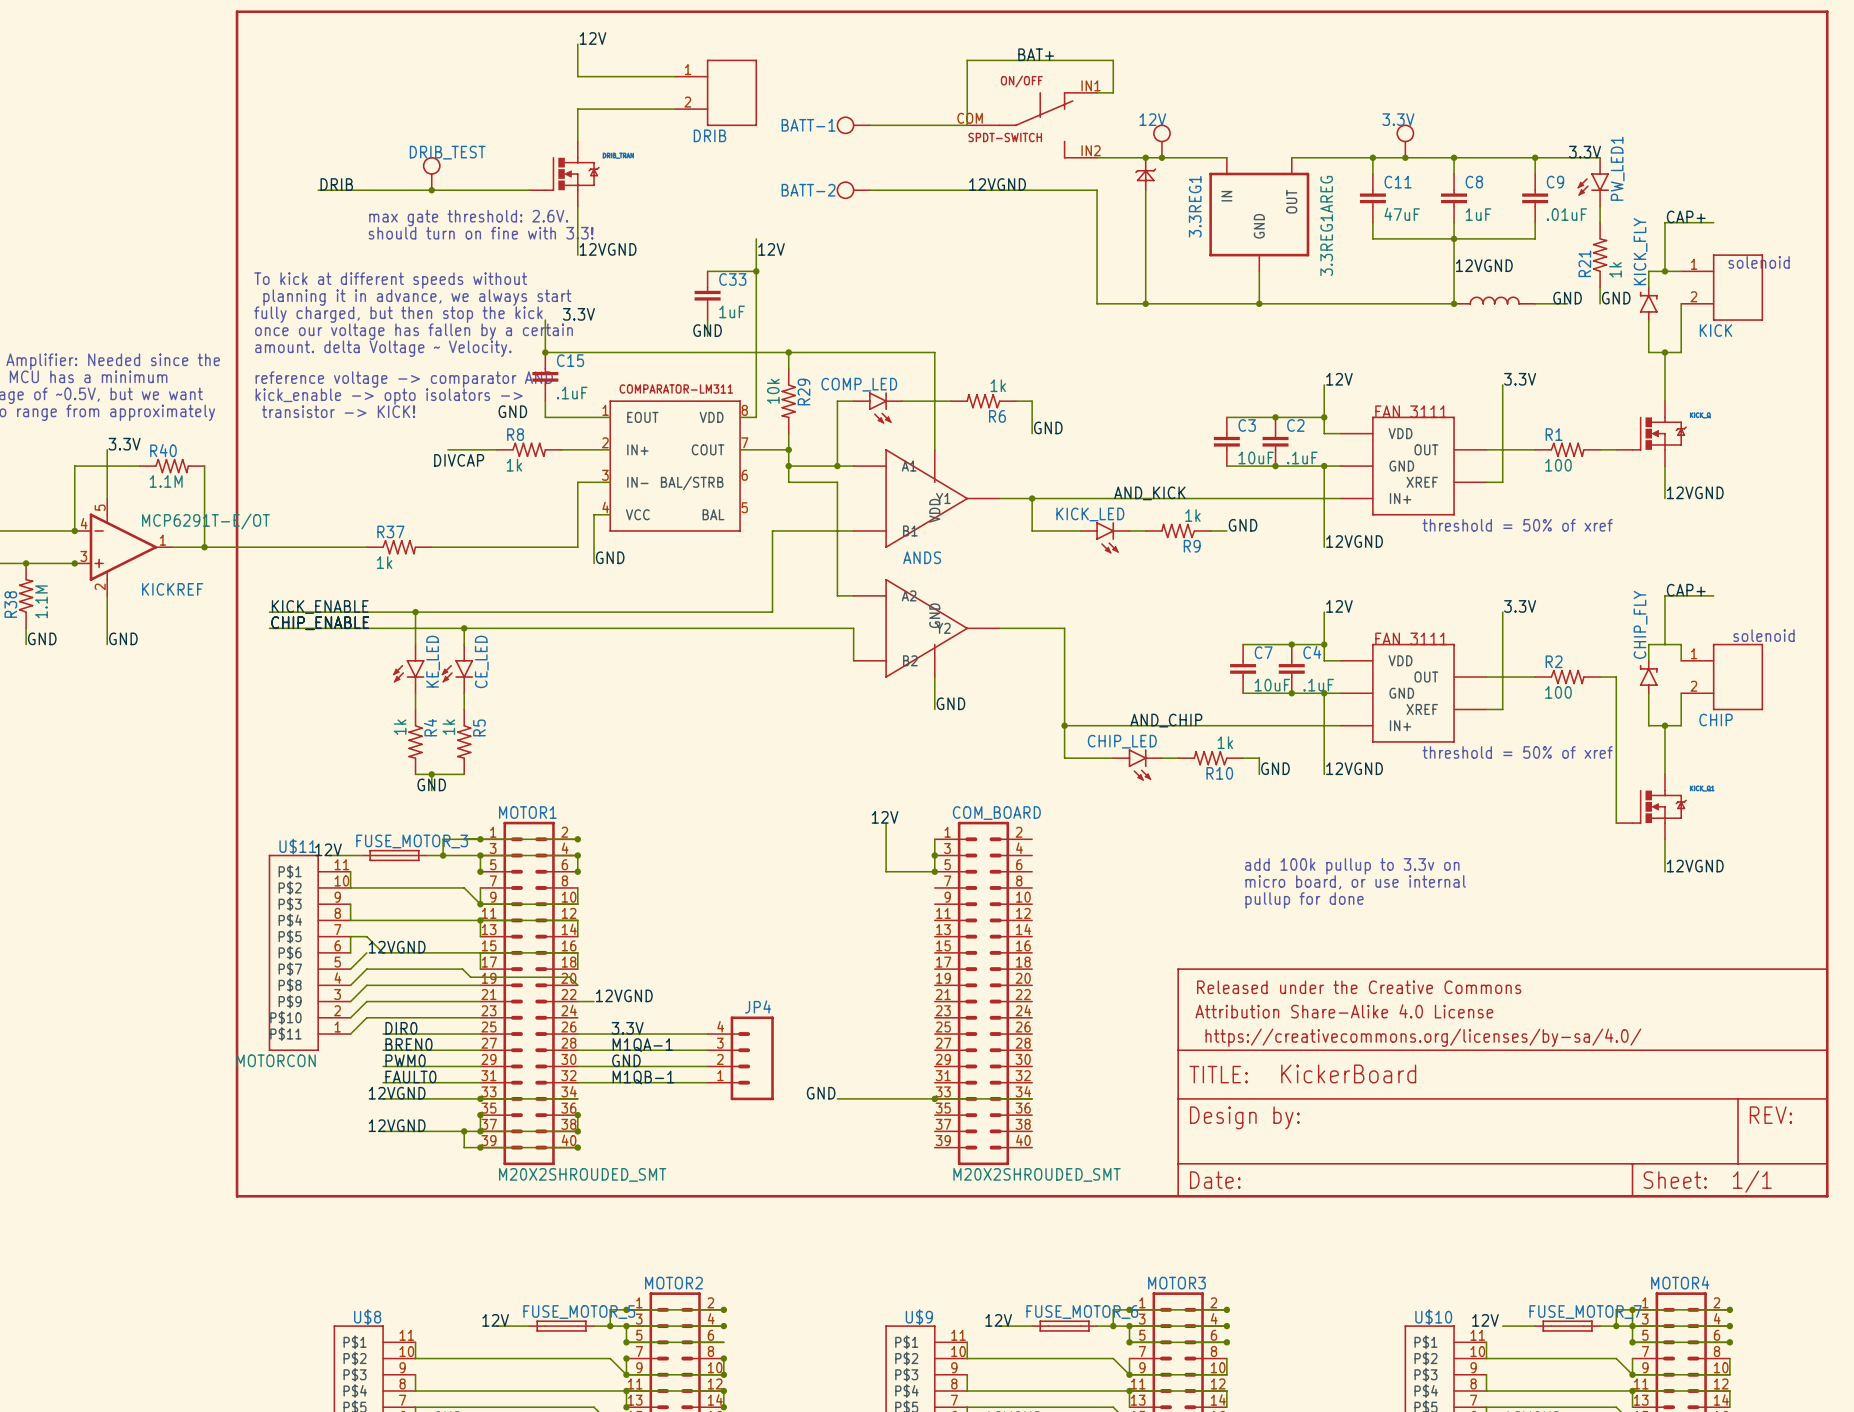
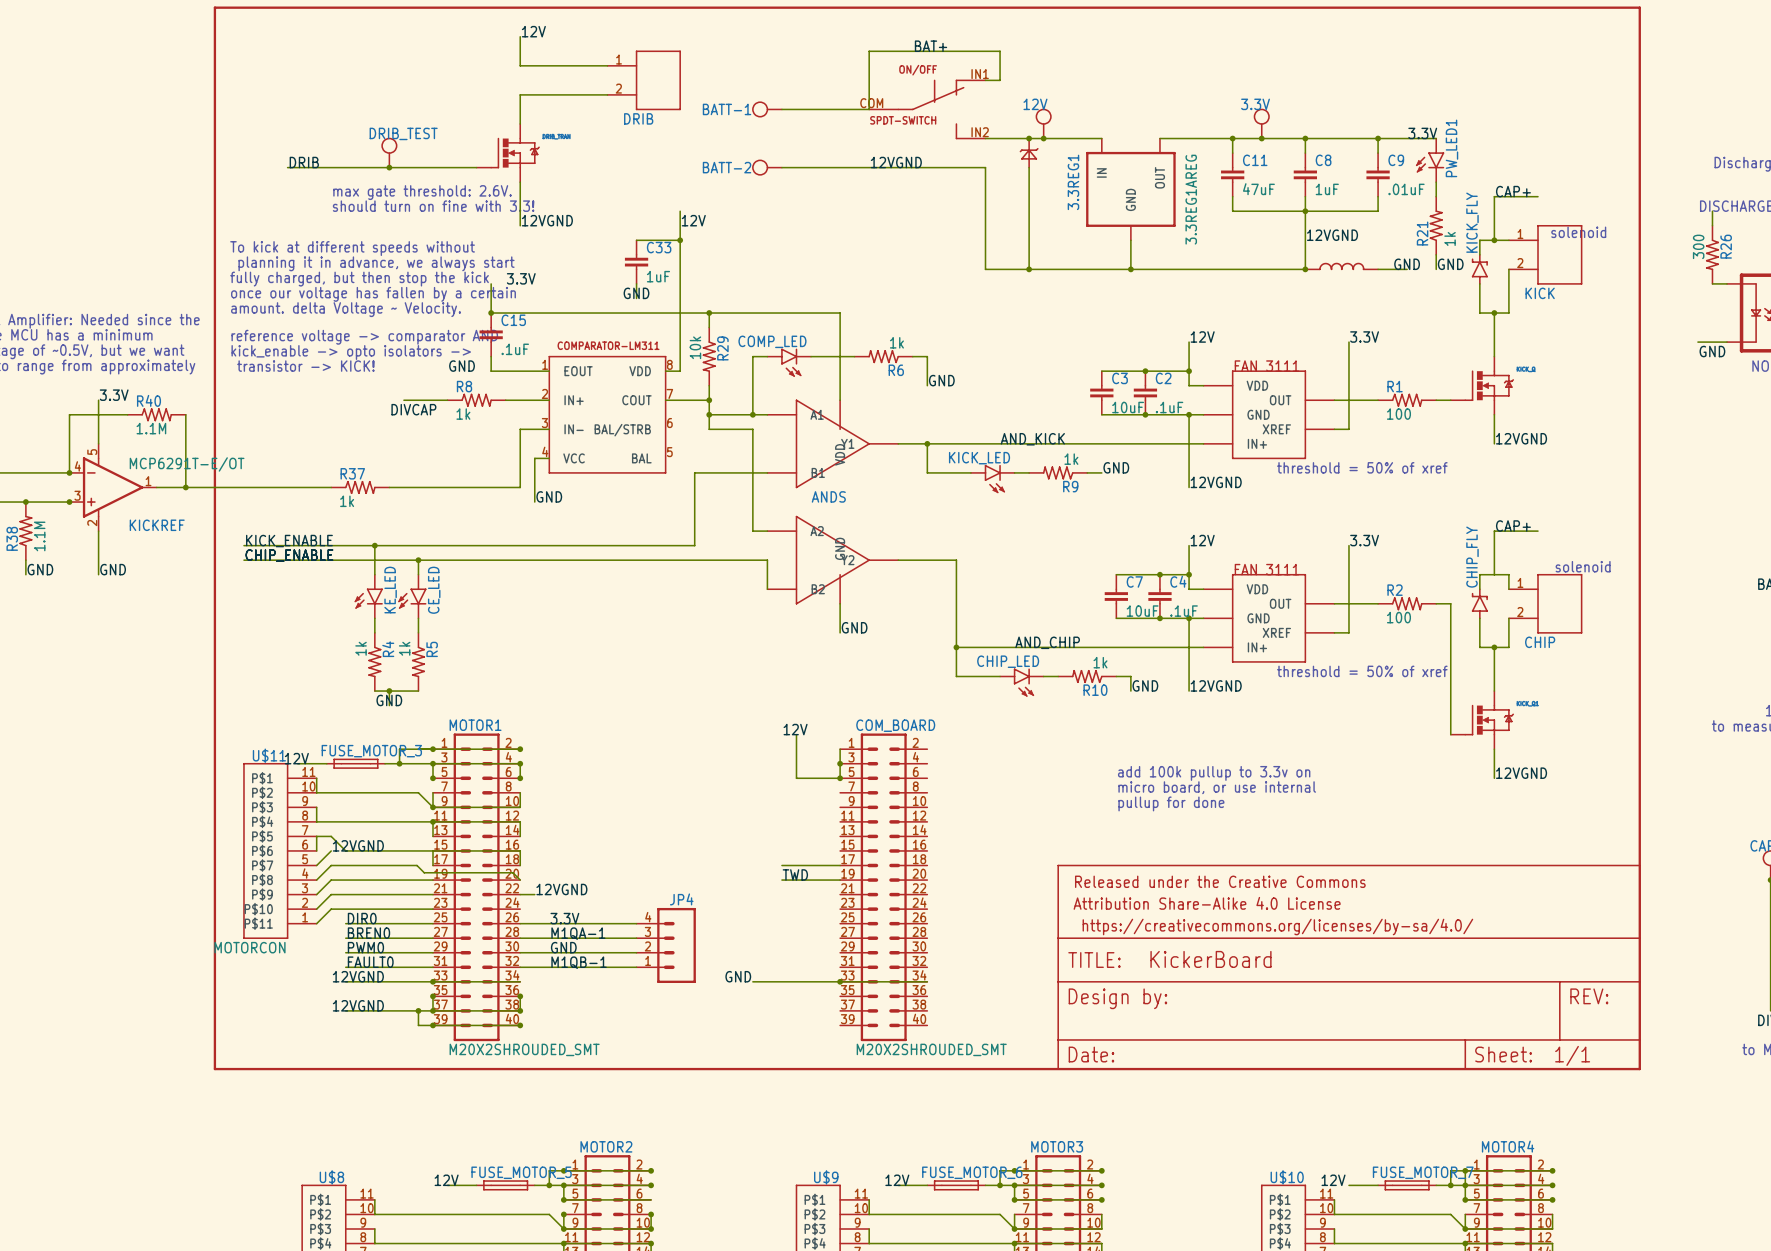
wire: none -> (781, 865) (840, 865)
label: none -> TWD (795, 874)
wire: none -> (781, 880) (840, 880)

